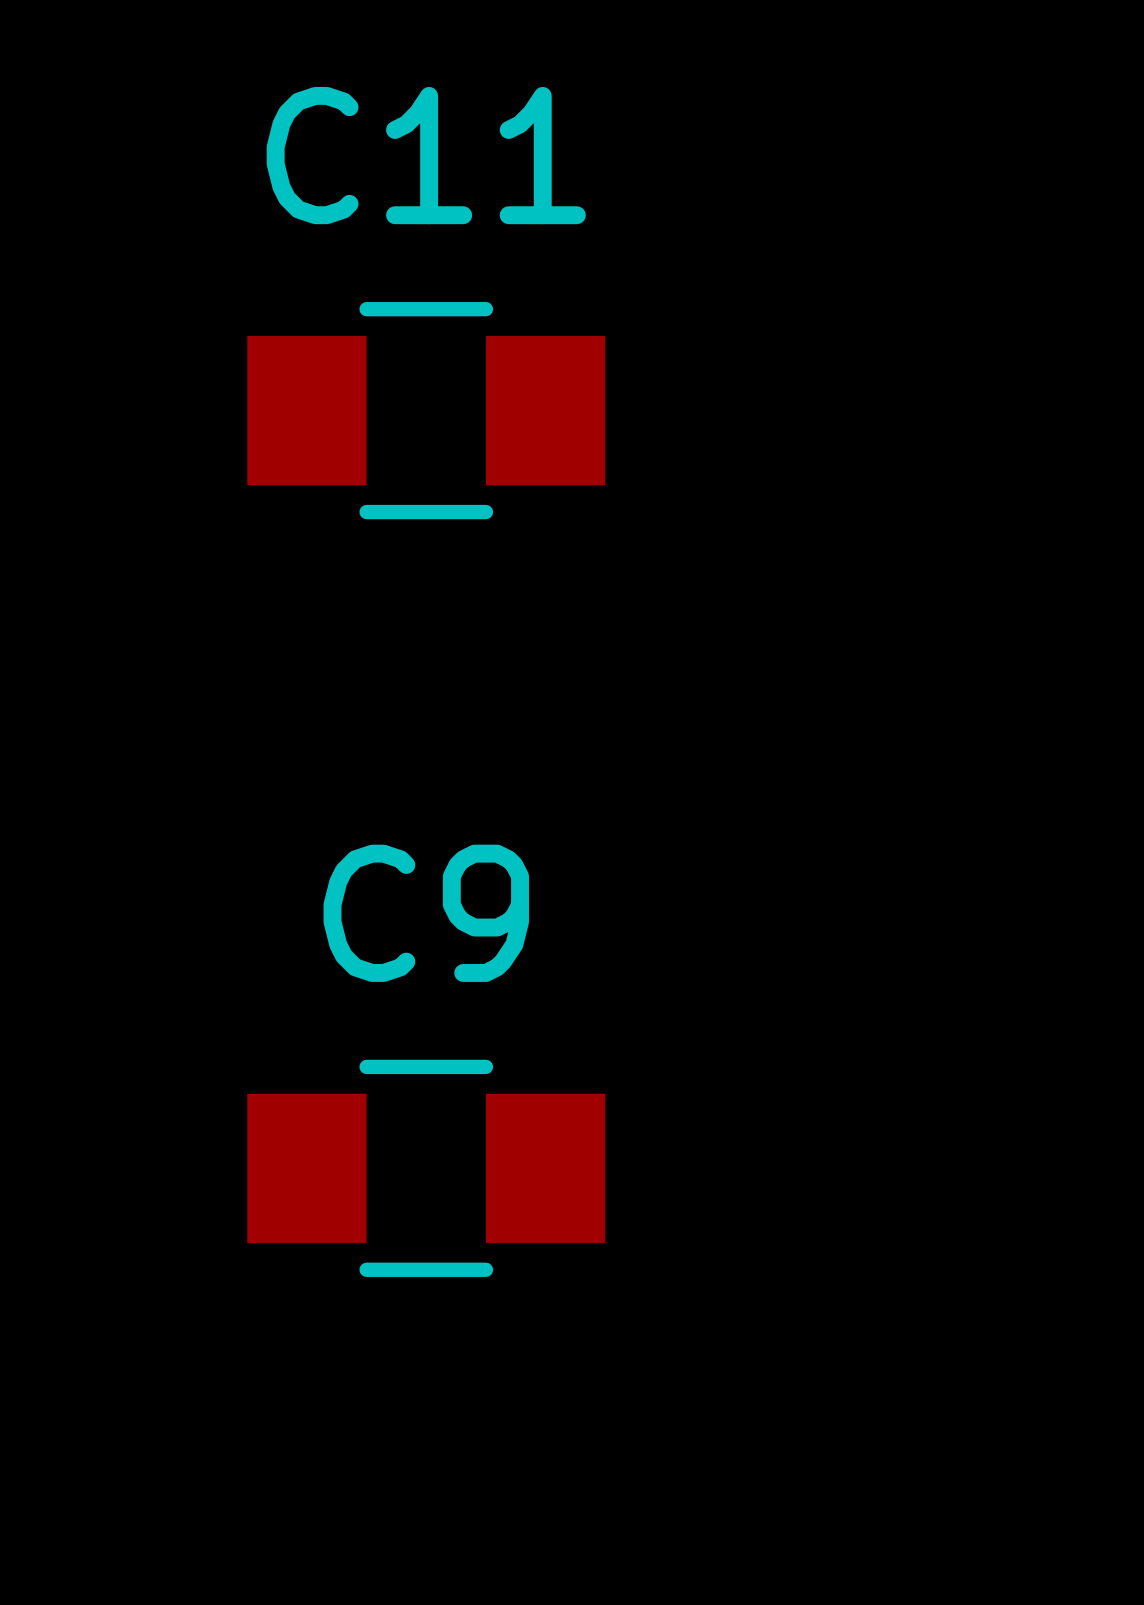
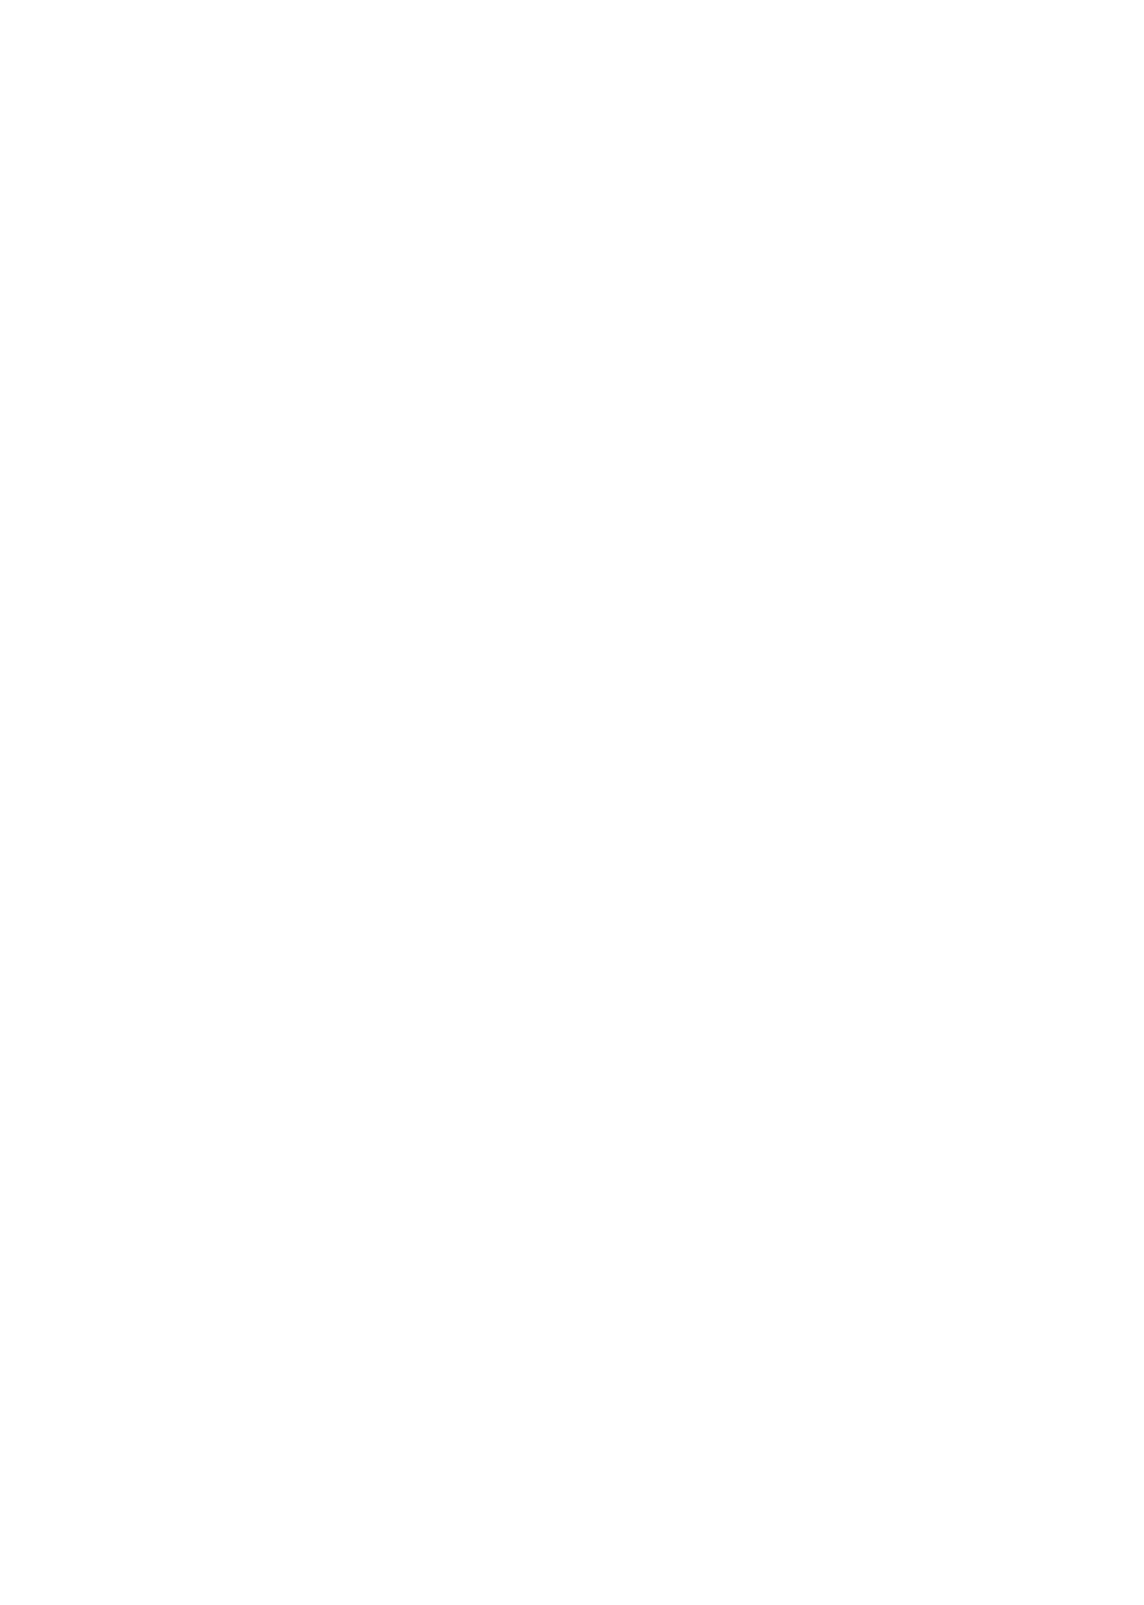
C11: (426, 410) -> none
C9: (426, 1168) -> none

